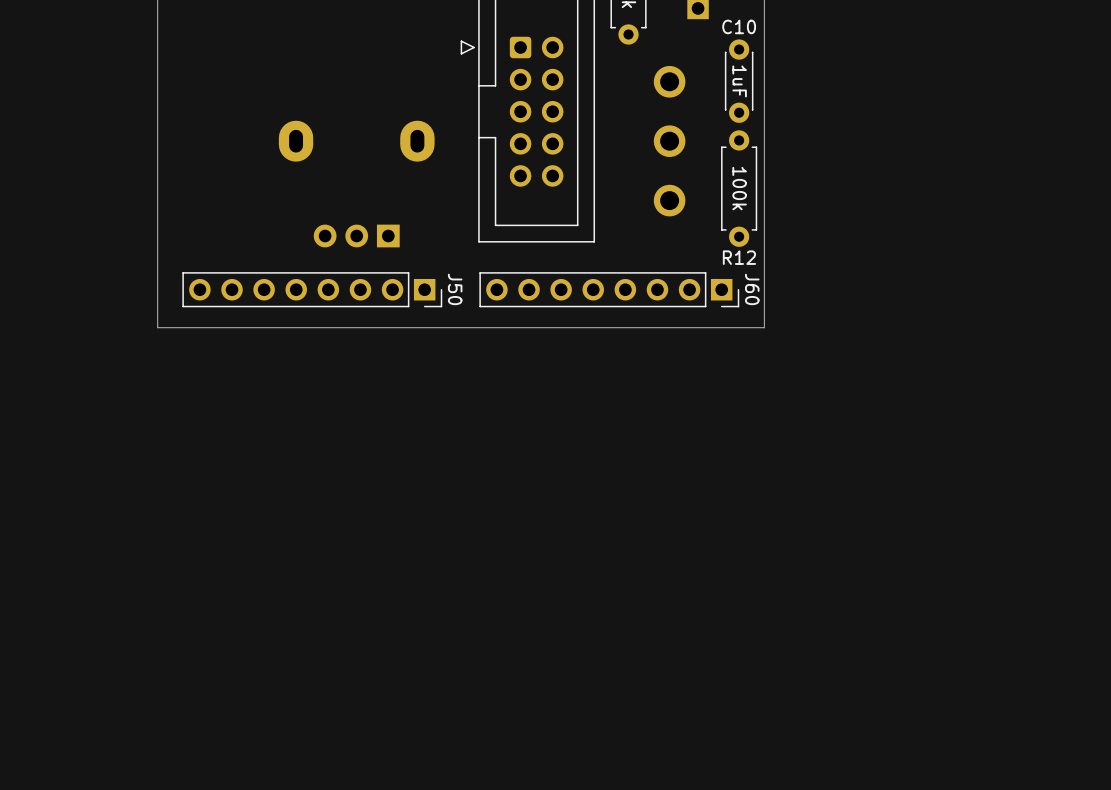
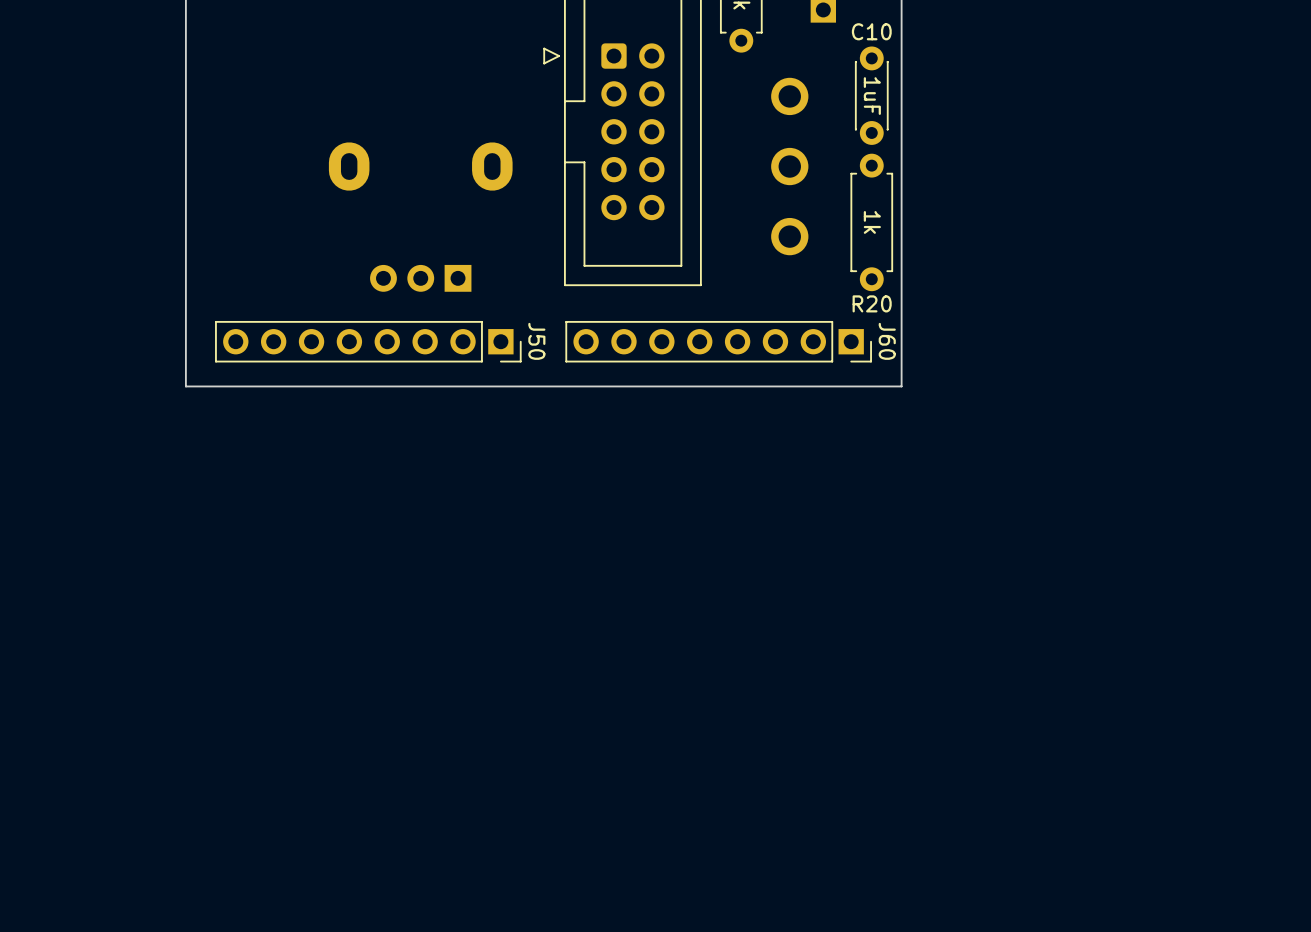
R12 value: 100k (739, 188) -> 1k (872, 222)
R12 name: R12 (739, 257) -> R20 (872, 303)

